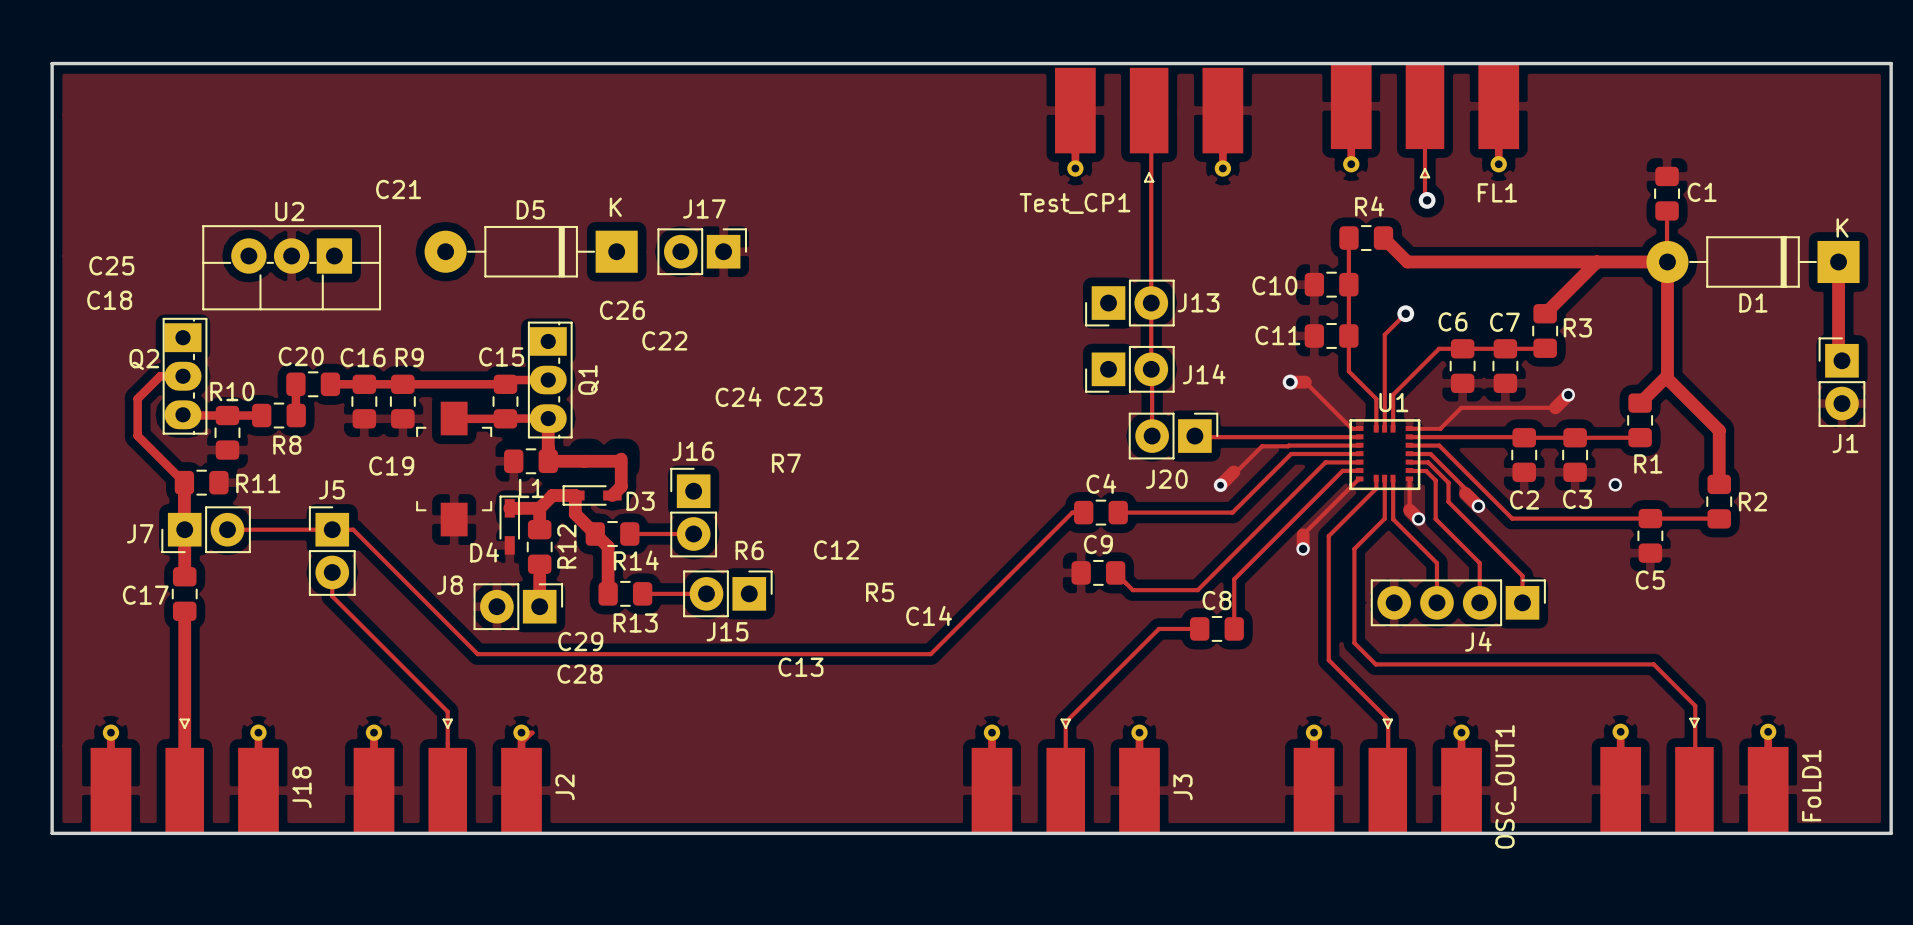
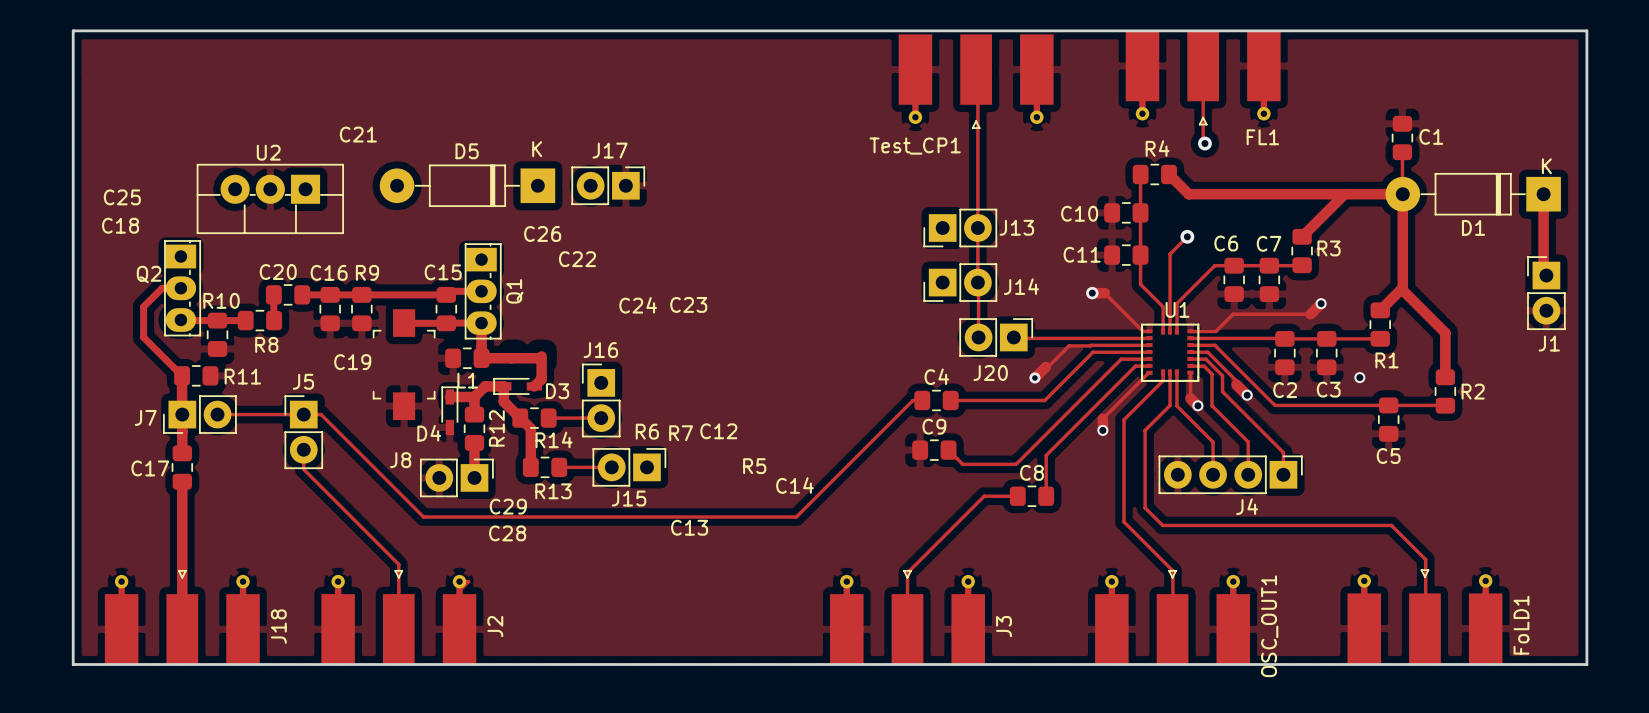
R7 position: (786, 463) -> (681, 433)

